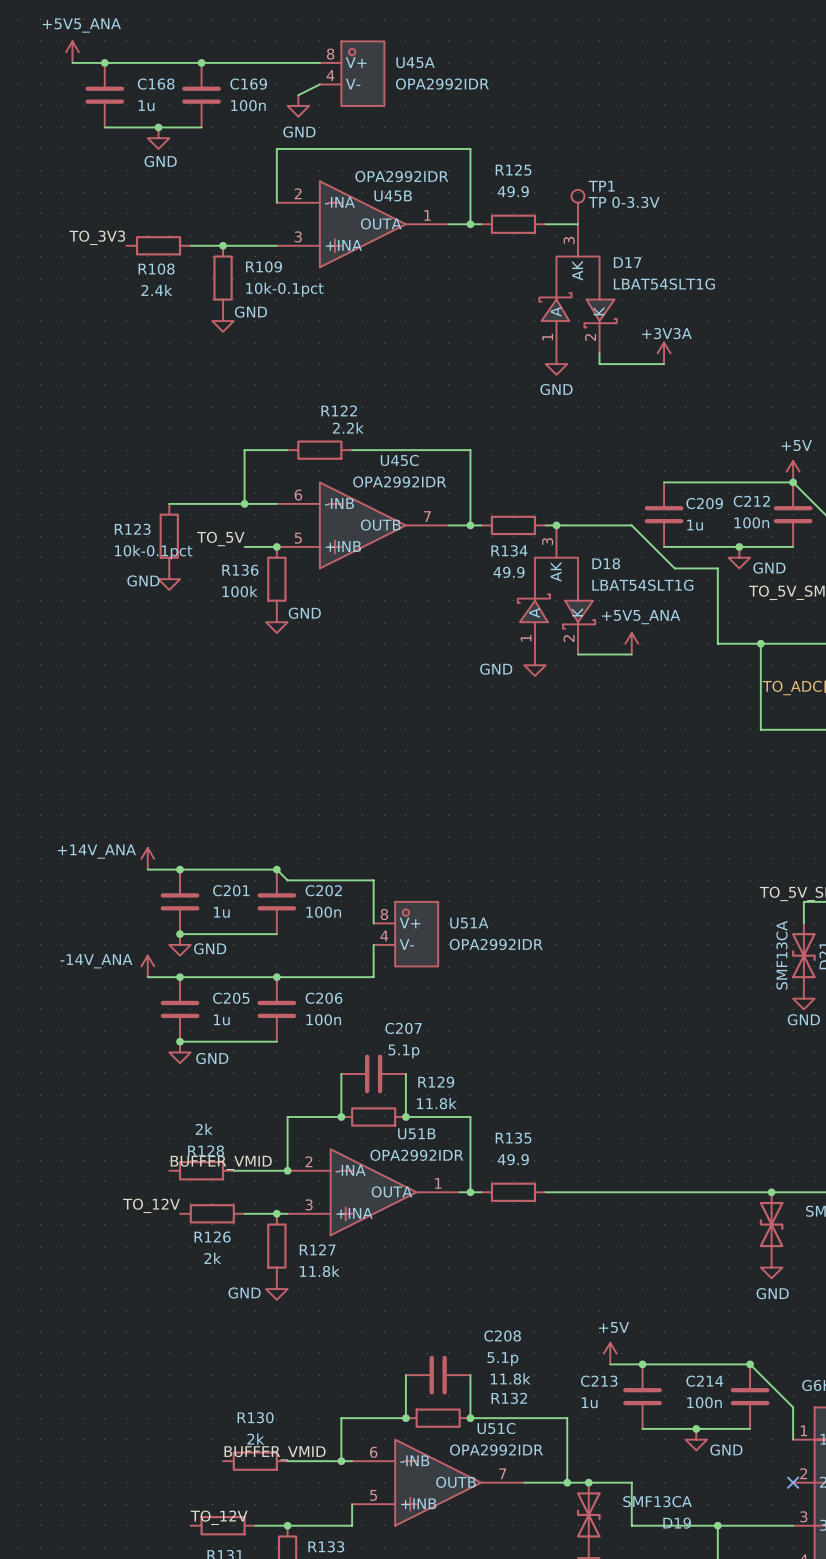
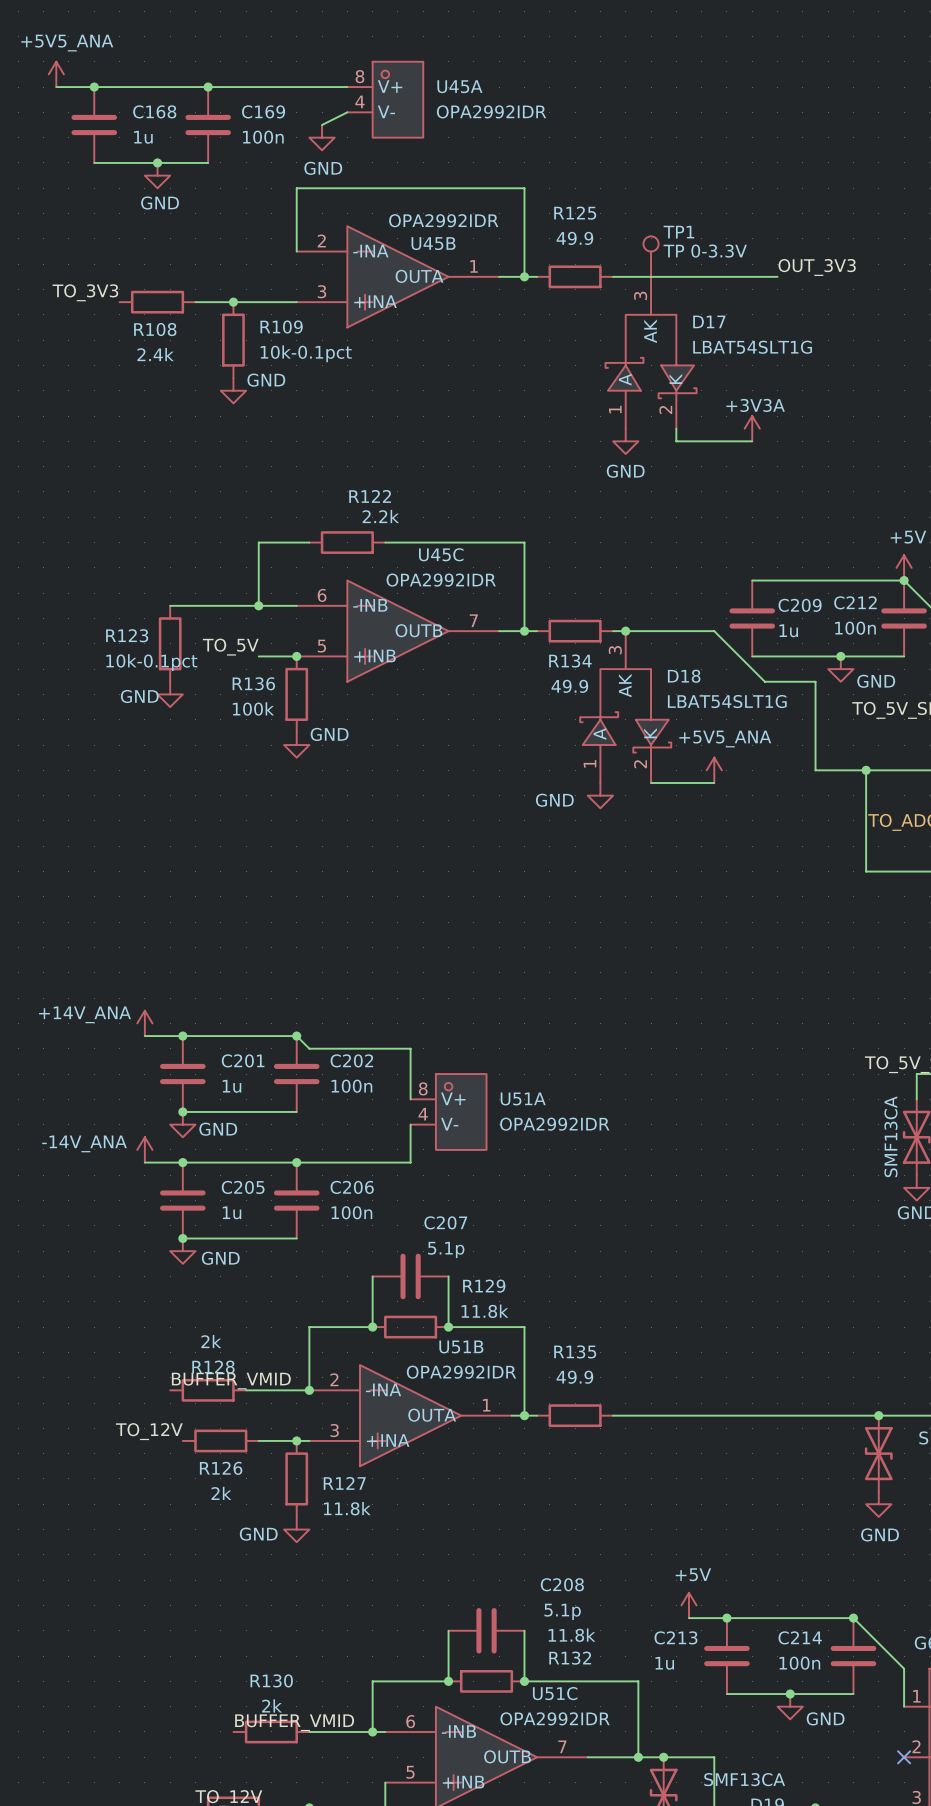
label: none -> OUT_3V3 (817, 267)
wire: none -> (651, 276) (777, 276)

